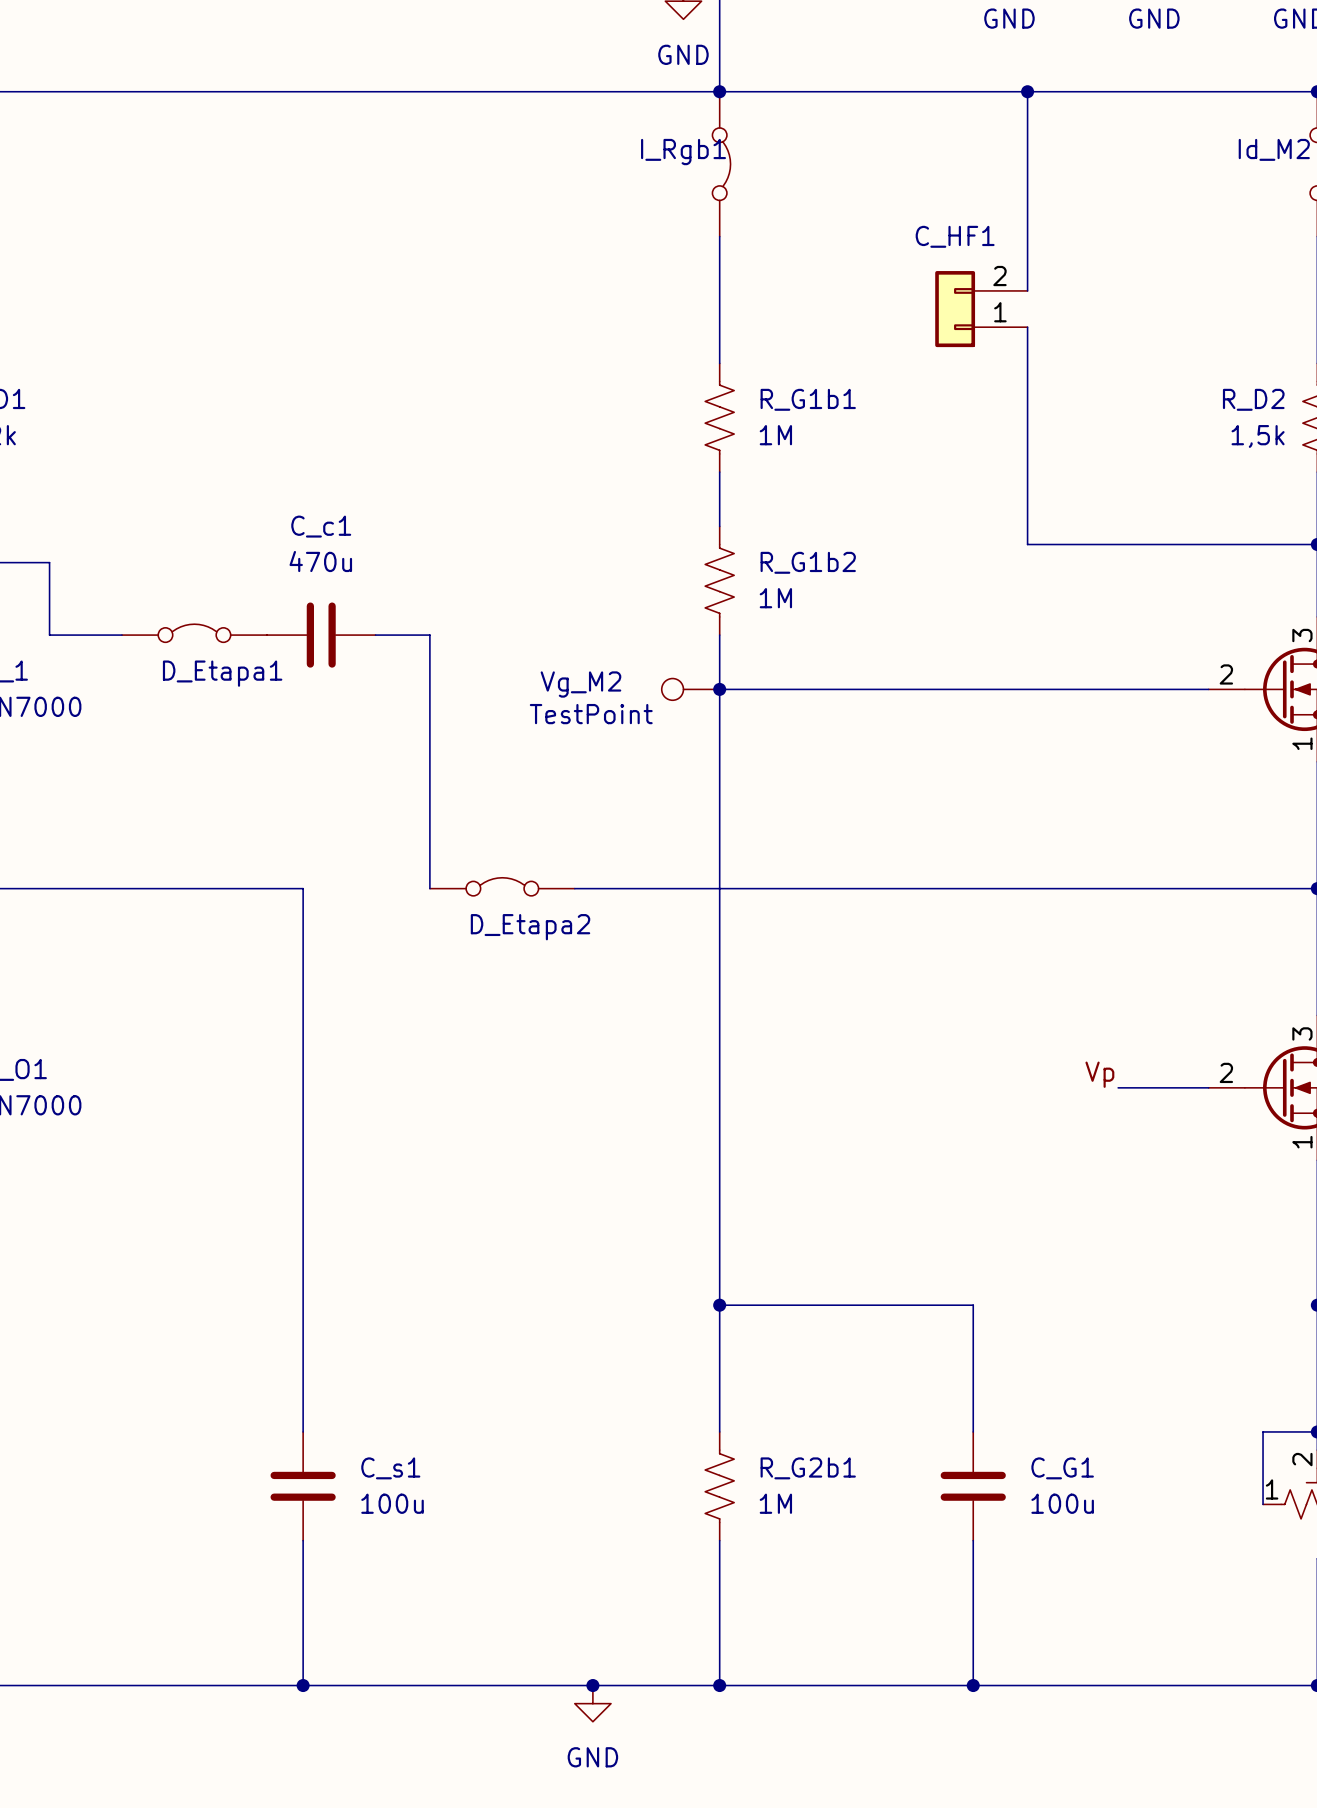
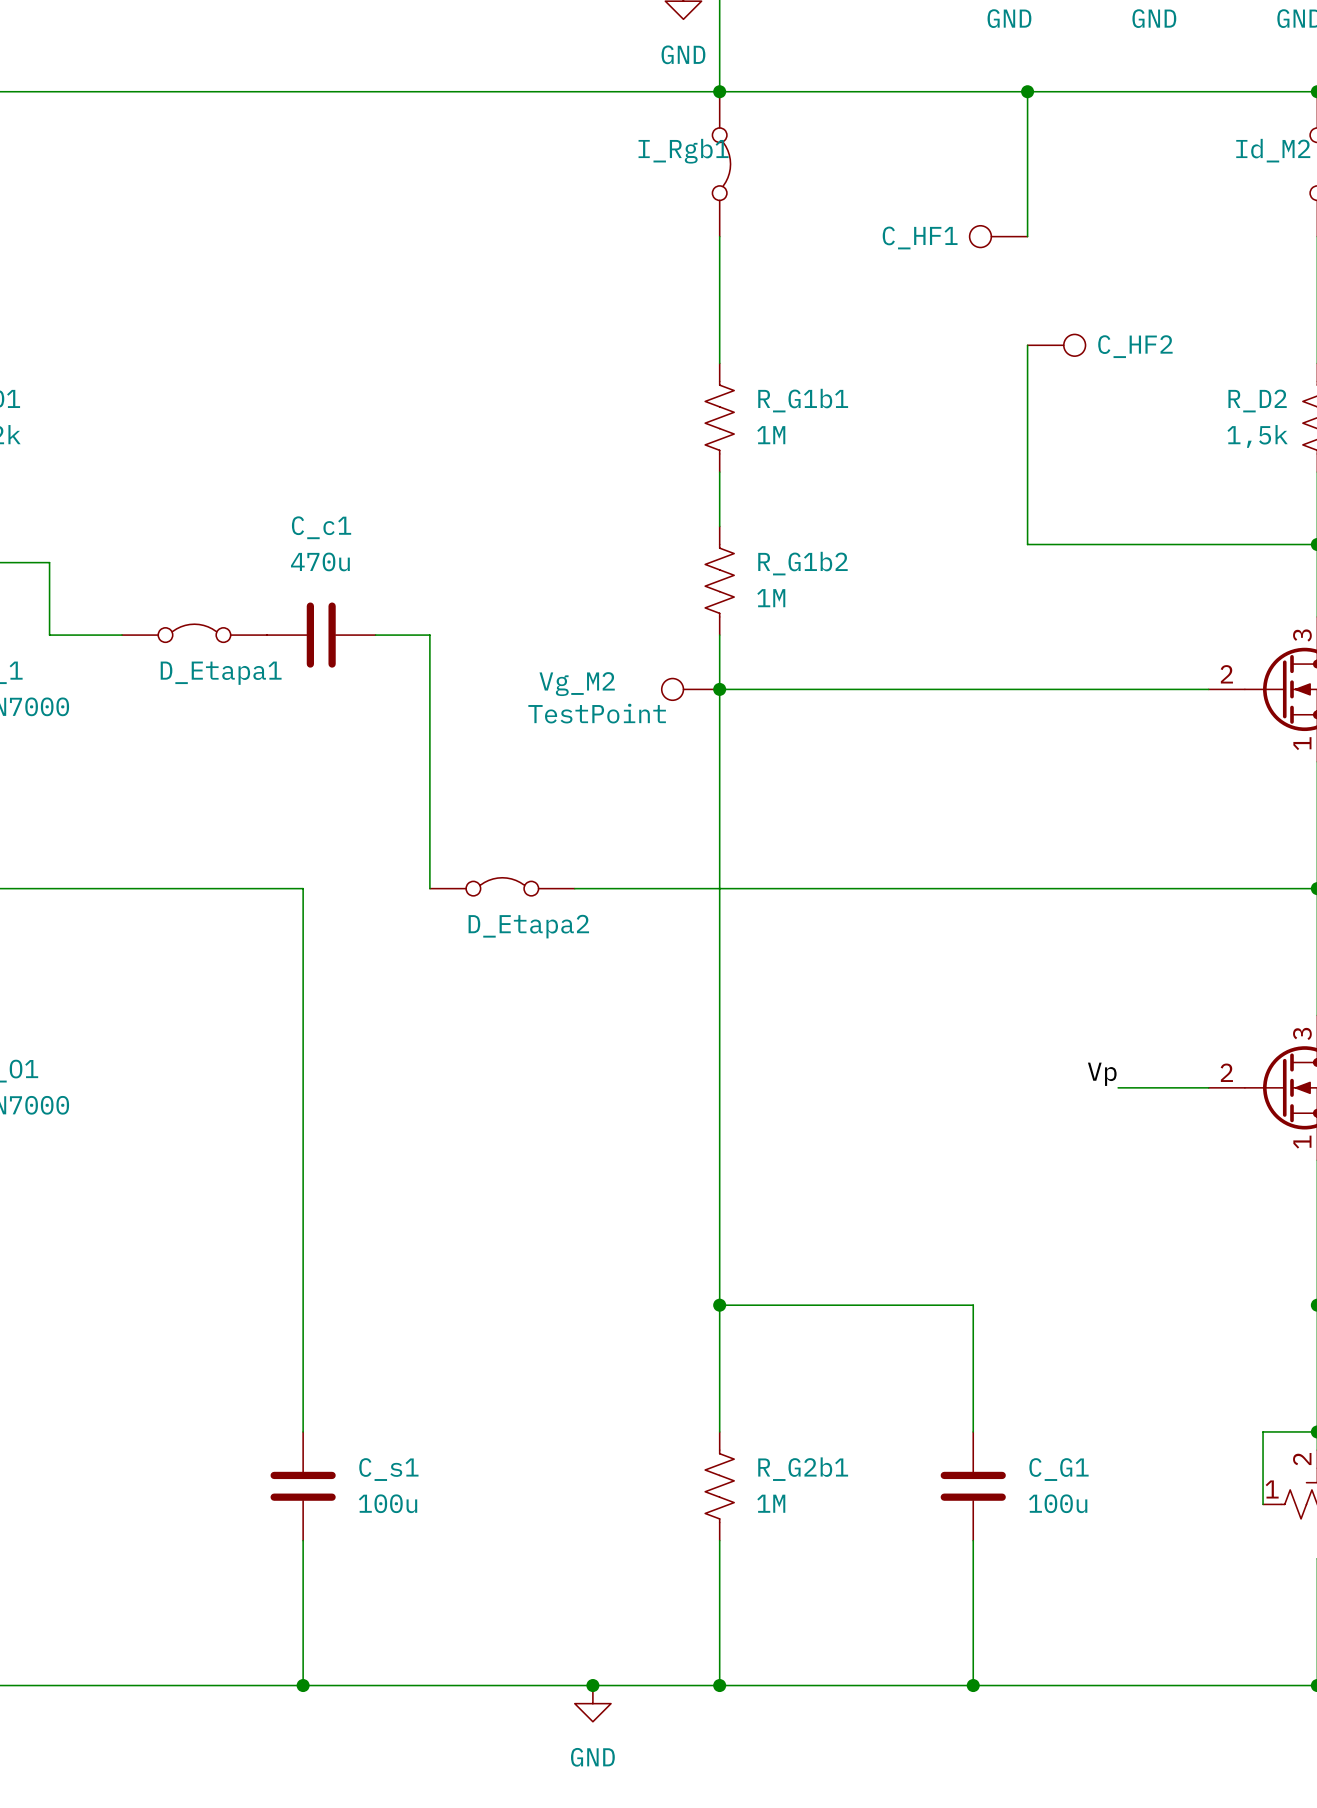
C_HF1 name position: C_HF1 (955, 236) -> C_HF1 (920, 237)
wire: (1027, 236) (1027, 290) -> none
C_HF1 symbol: [935, 271, 1028, 348] -> [969, 225, 1028, 248]
wire: (1027, 327) (1027, 345) -> none
C_HF2: none -> (1056, 345)

